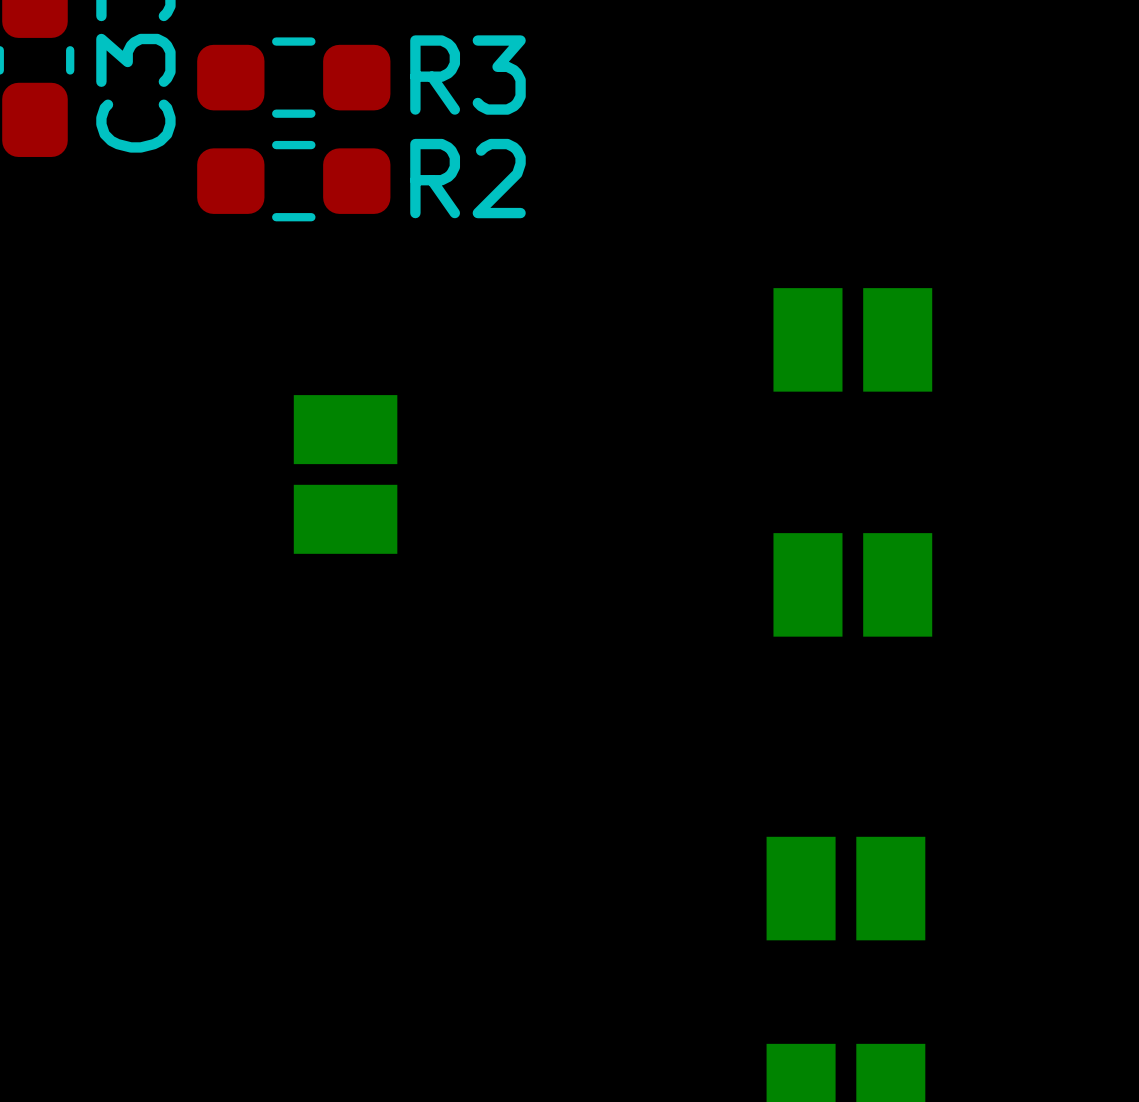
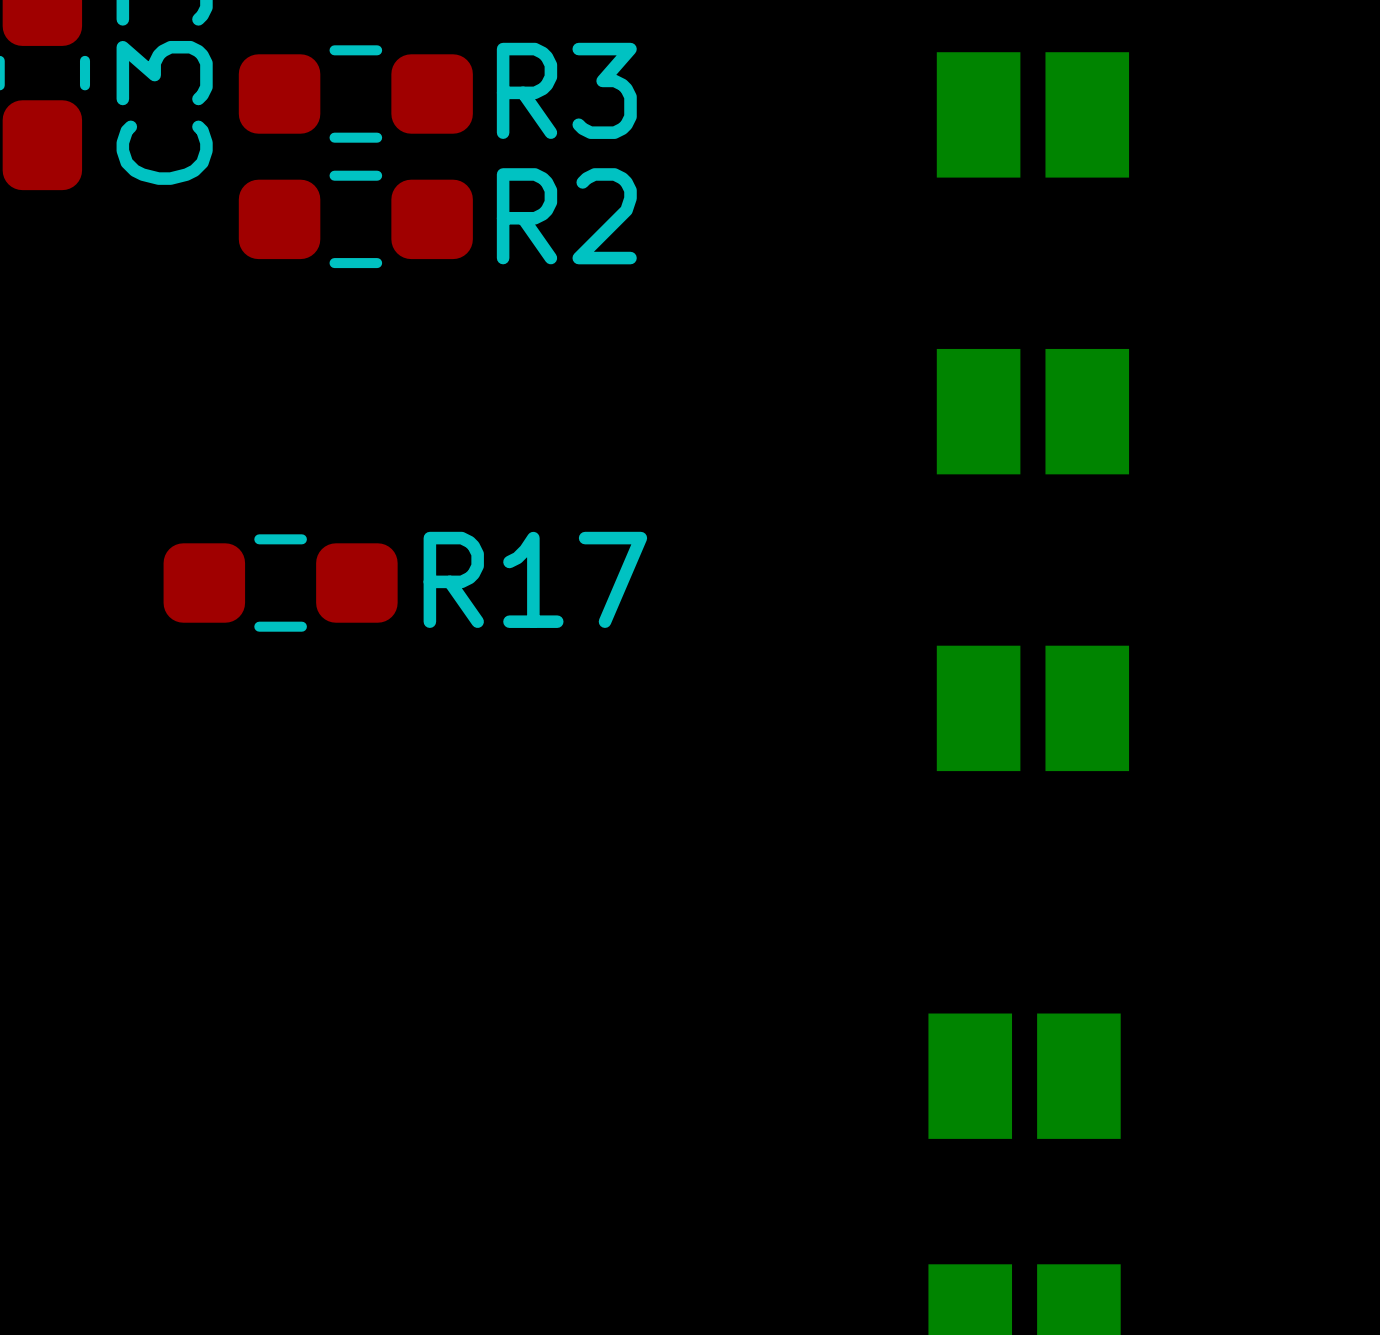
part rotation: 0° (345, 474) -> 90° clockwise (1032, 114)
part position: (345, 474) -> (1032, 114)
R17: none -> (280, 583)

